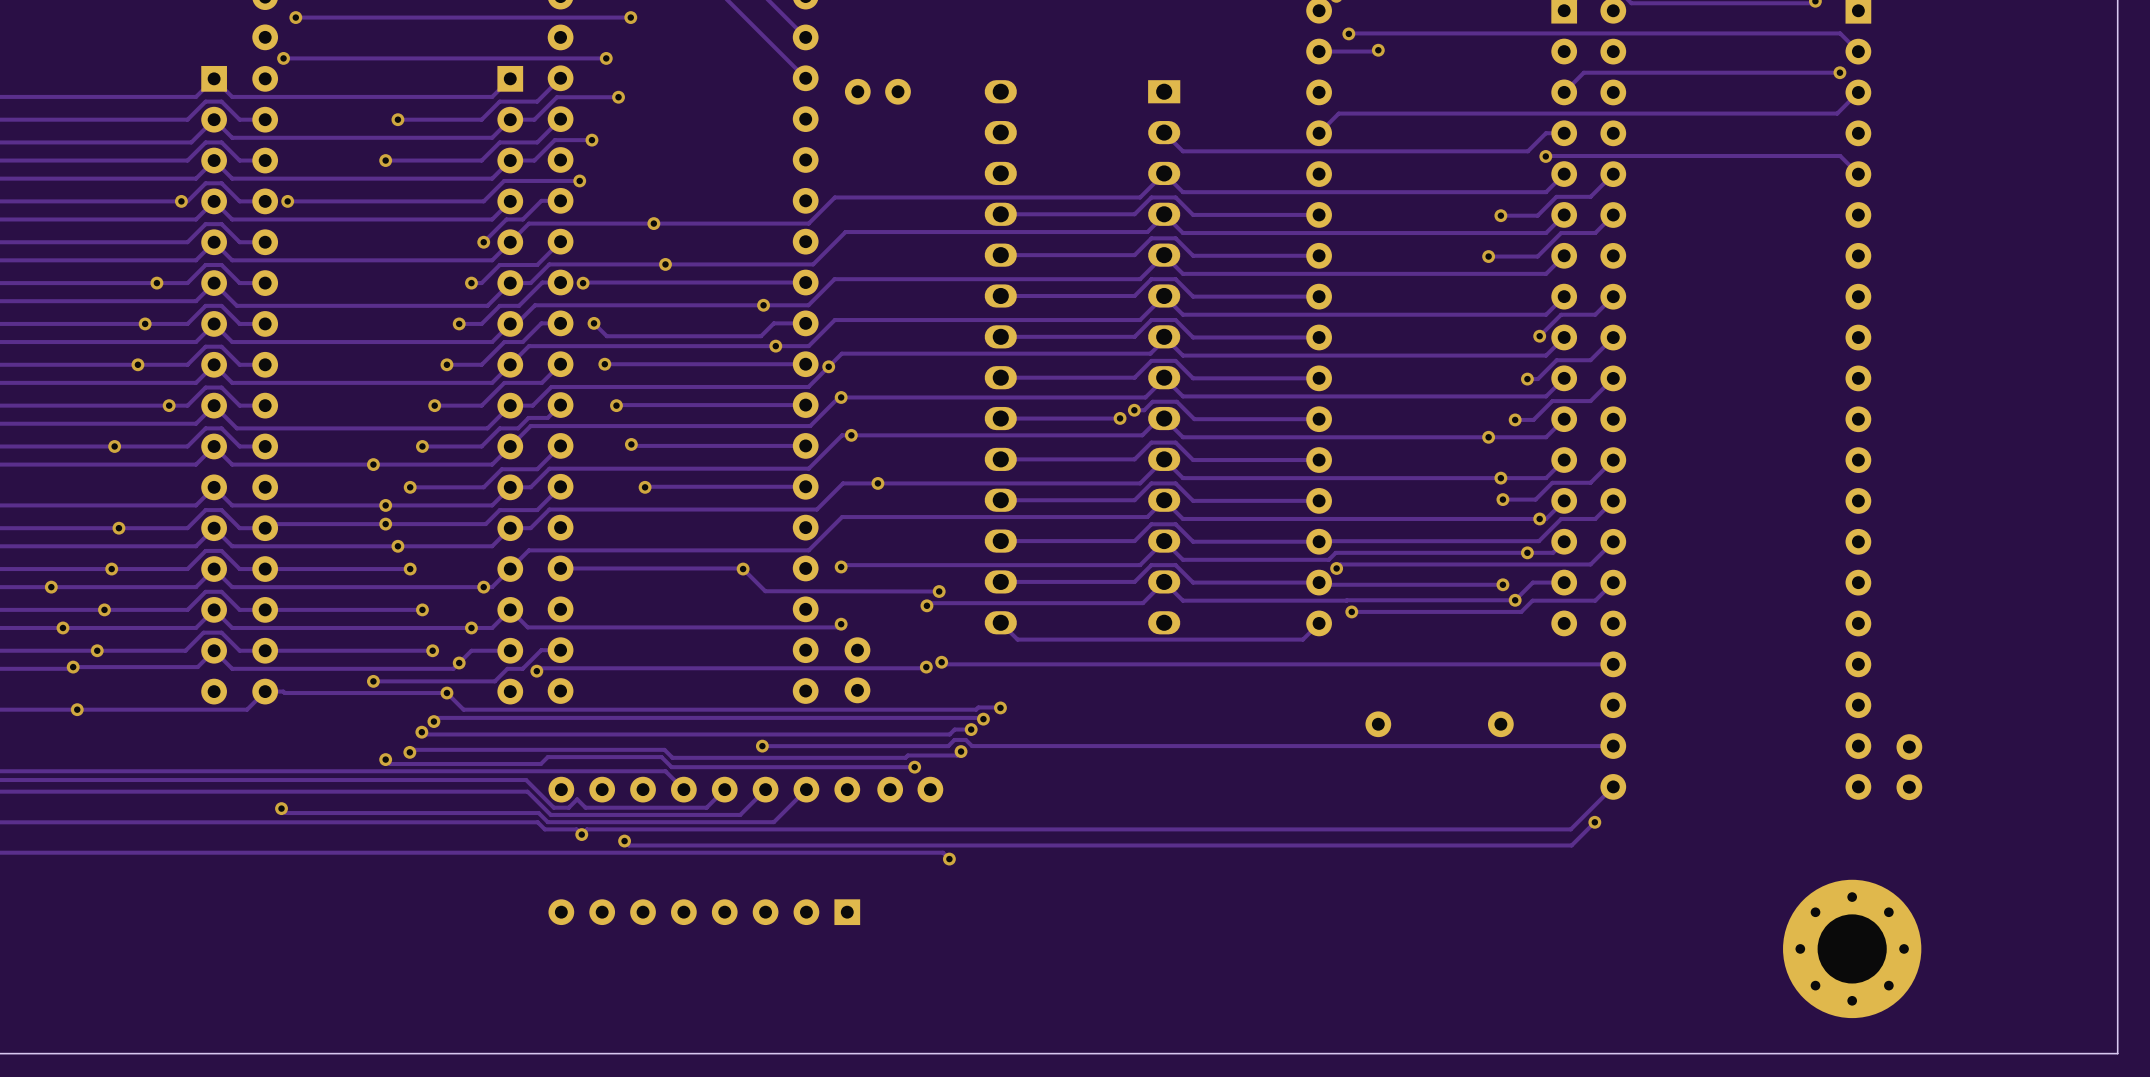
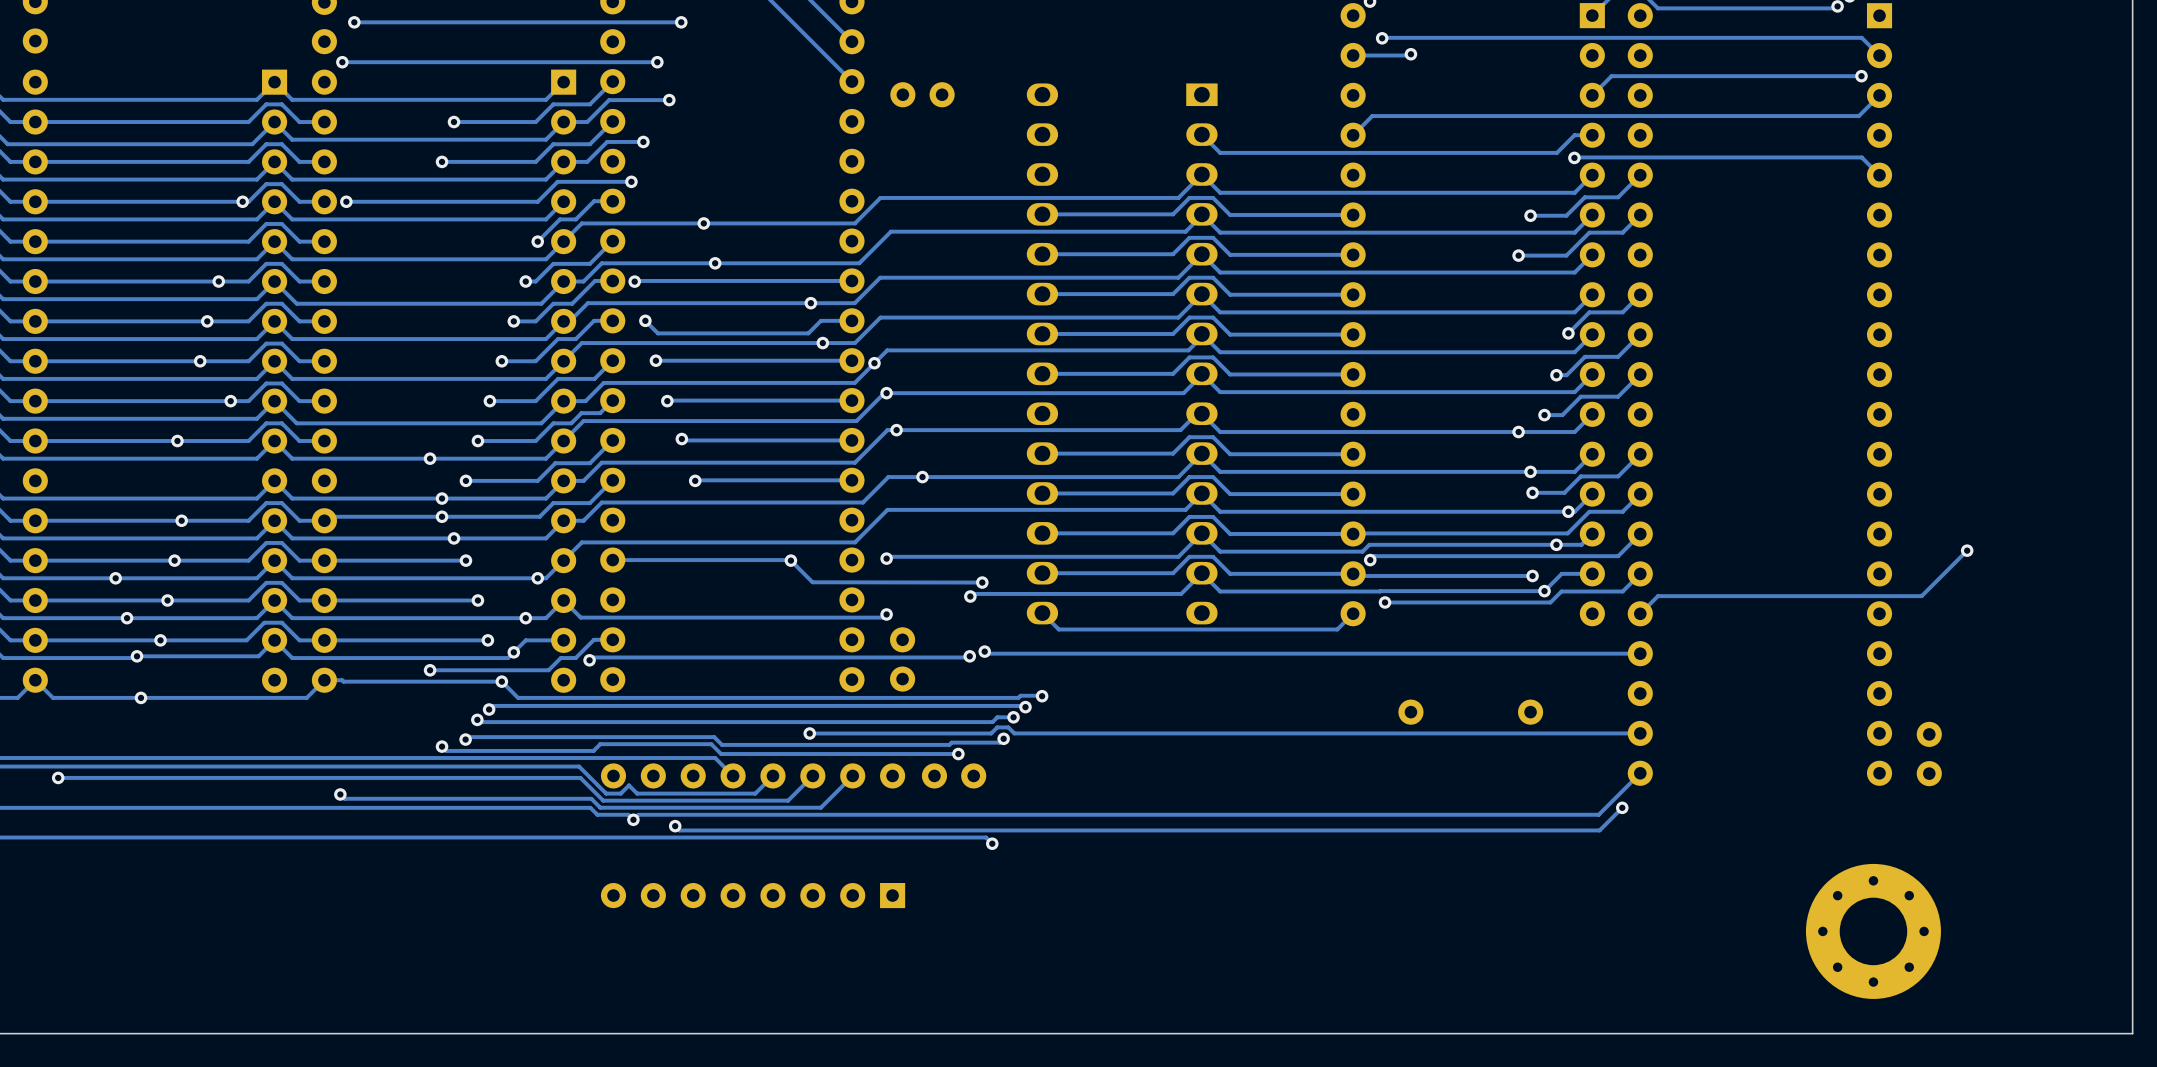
track: (1134, 410) (1144, 410) (1152, 401) (1176, 401) (1194, 419) (1319, 419) -> none
via: (1134, 410) -> none
track: (1119, 418) (1000, 418) -> none
via: (1120, 418) -> none
track: none -> (1967, 550) (1921, 596) (1657, 596) (1640, 613)
via: none -> (1967, 550)

